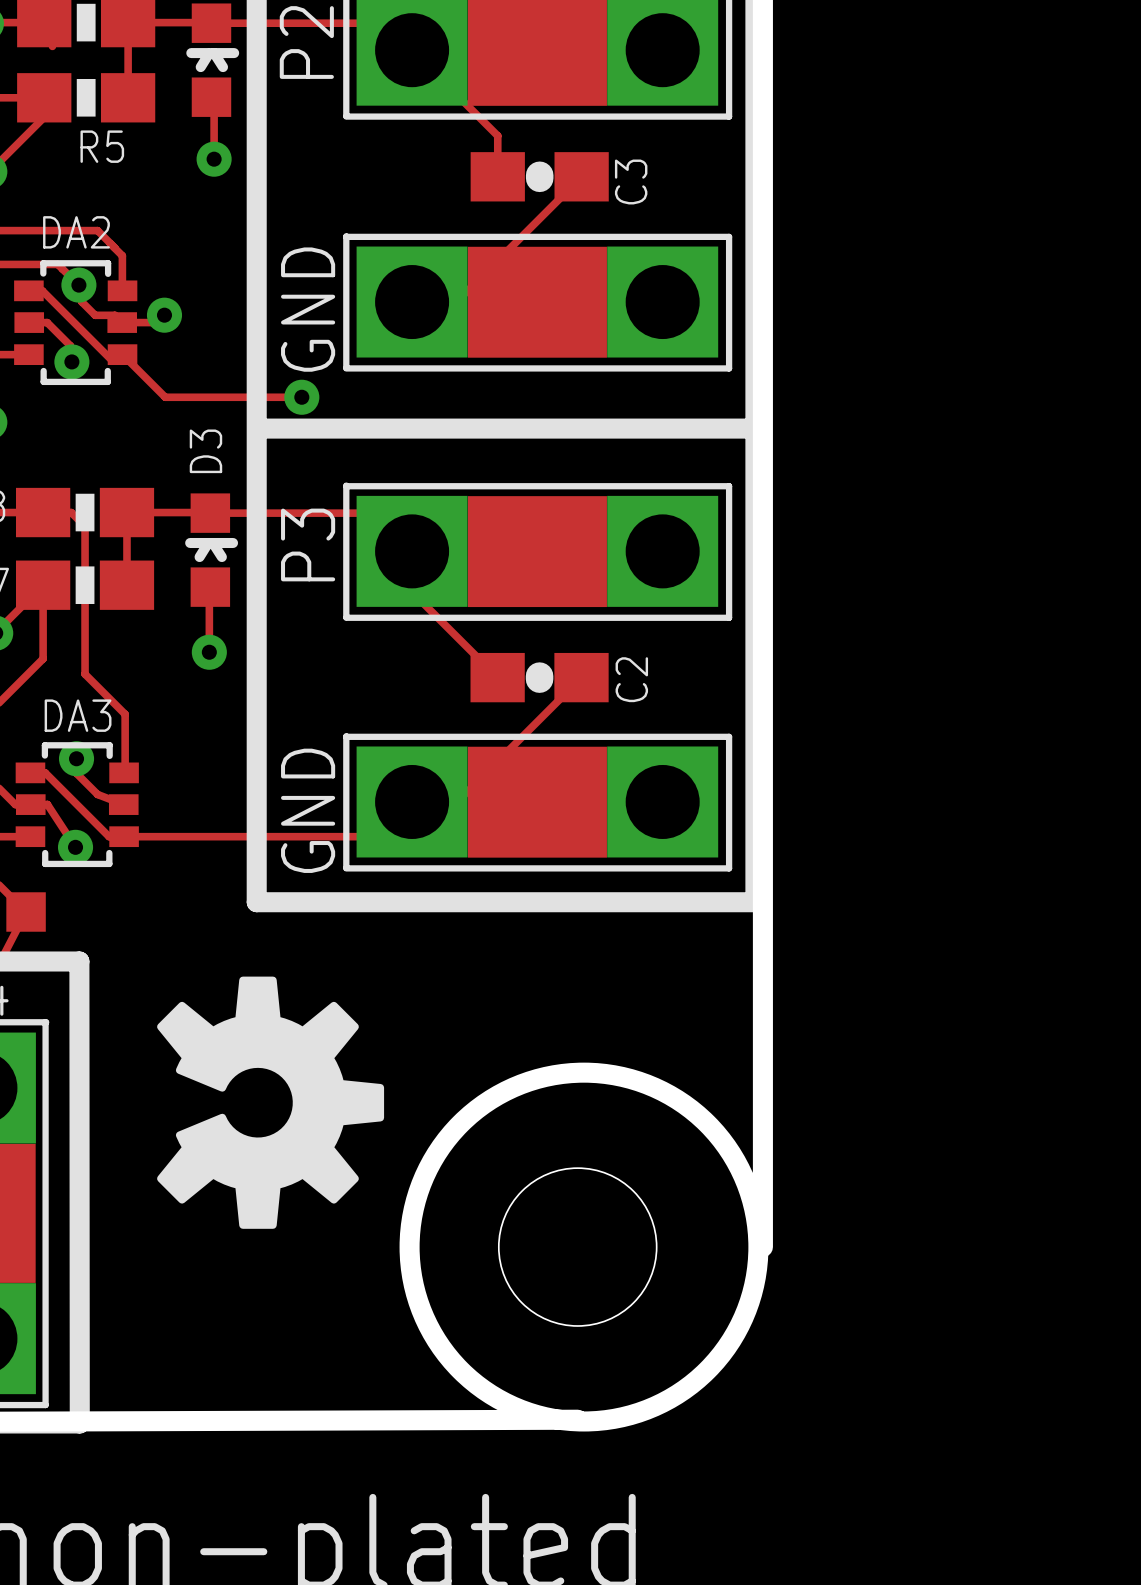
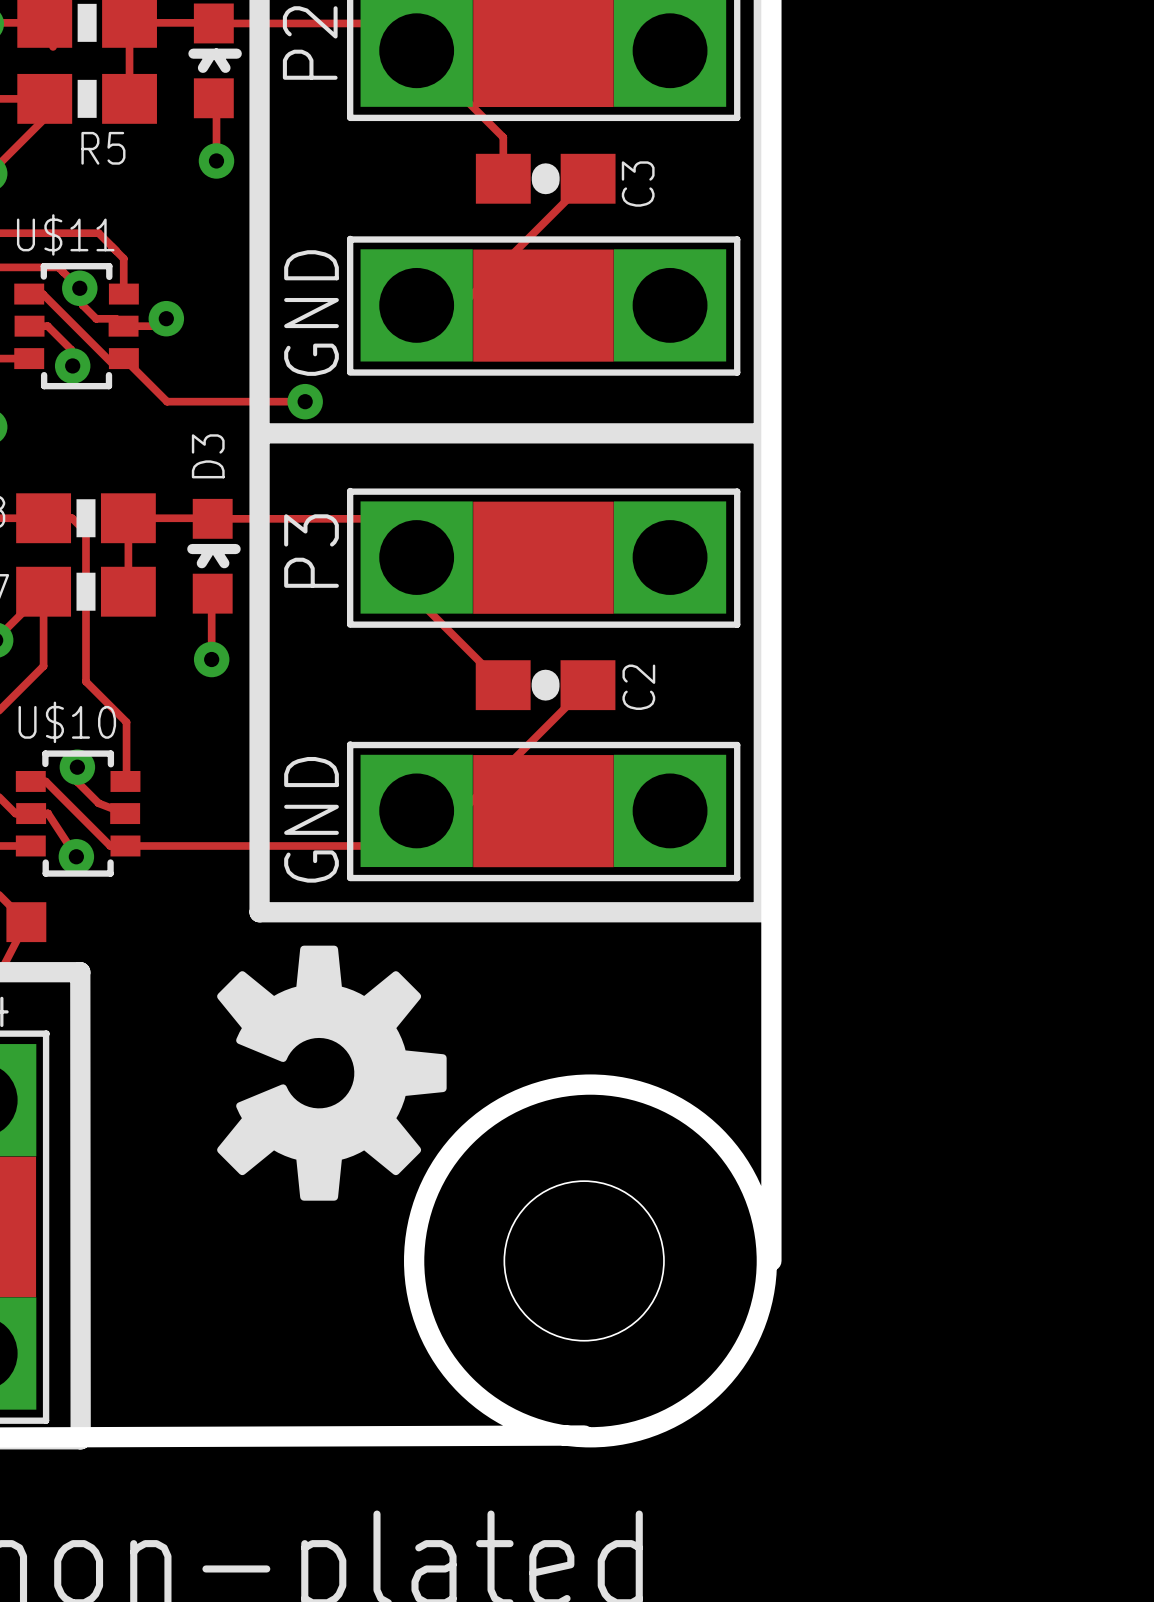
DA2 name: DA2 (76, 232) -> U$11 (65, 234)
DA3 name: DA3 (78, 715) -> U$10 (67, 722)
drawing position: (270, 1102) -> (331, 1073)

